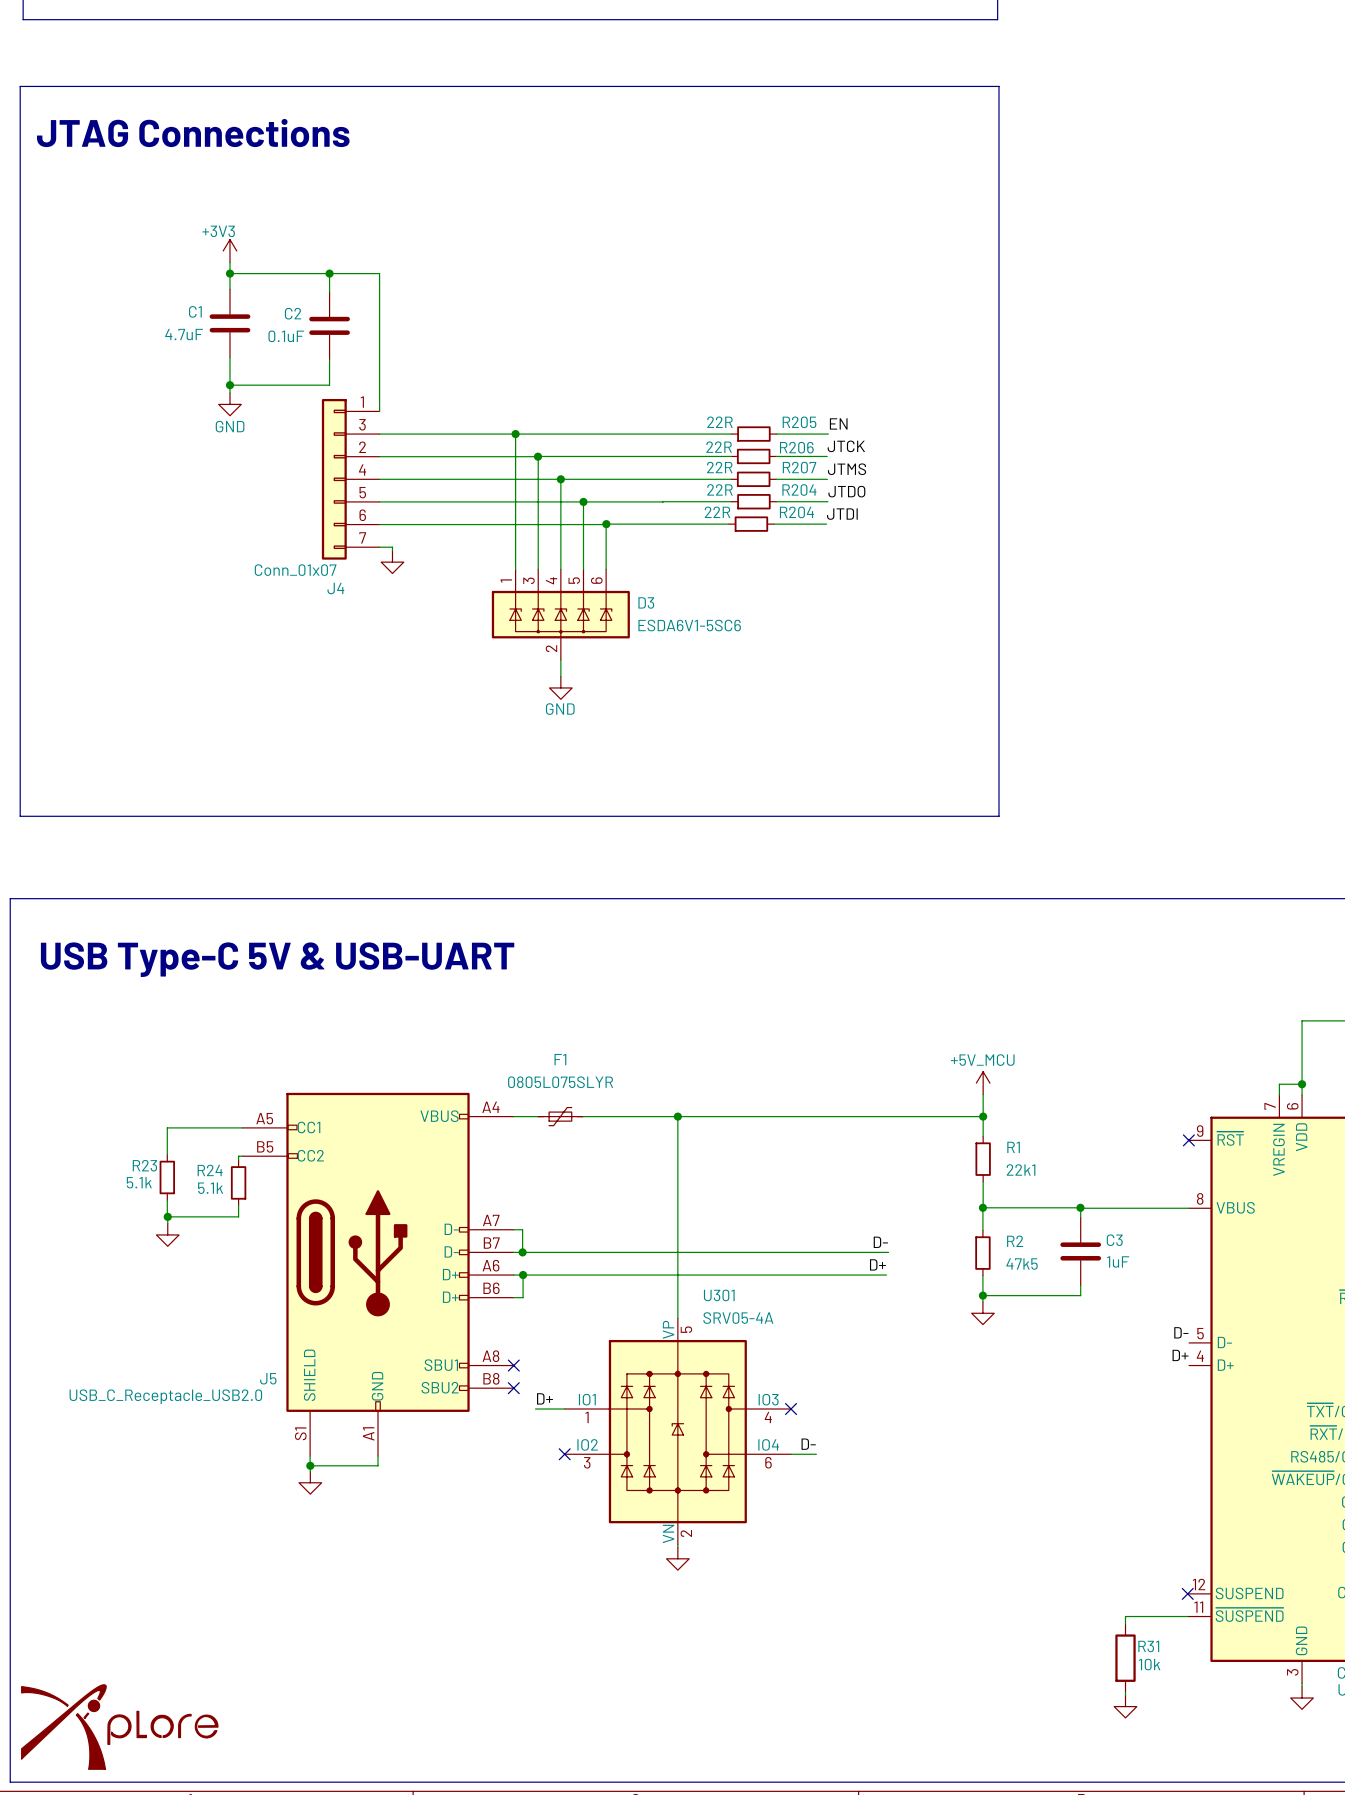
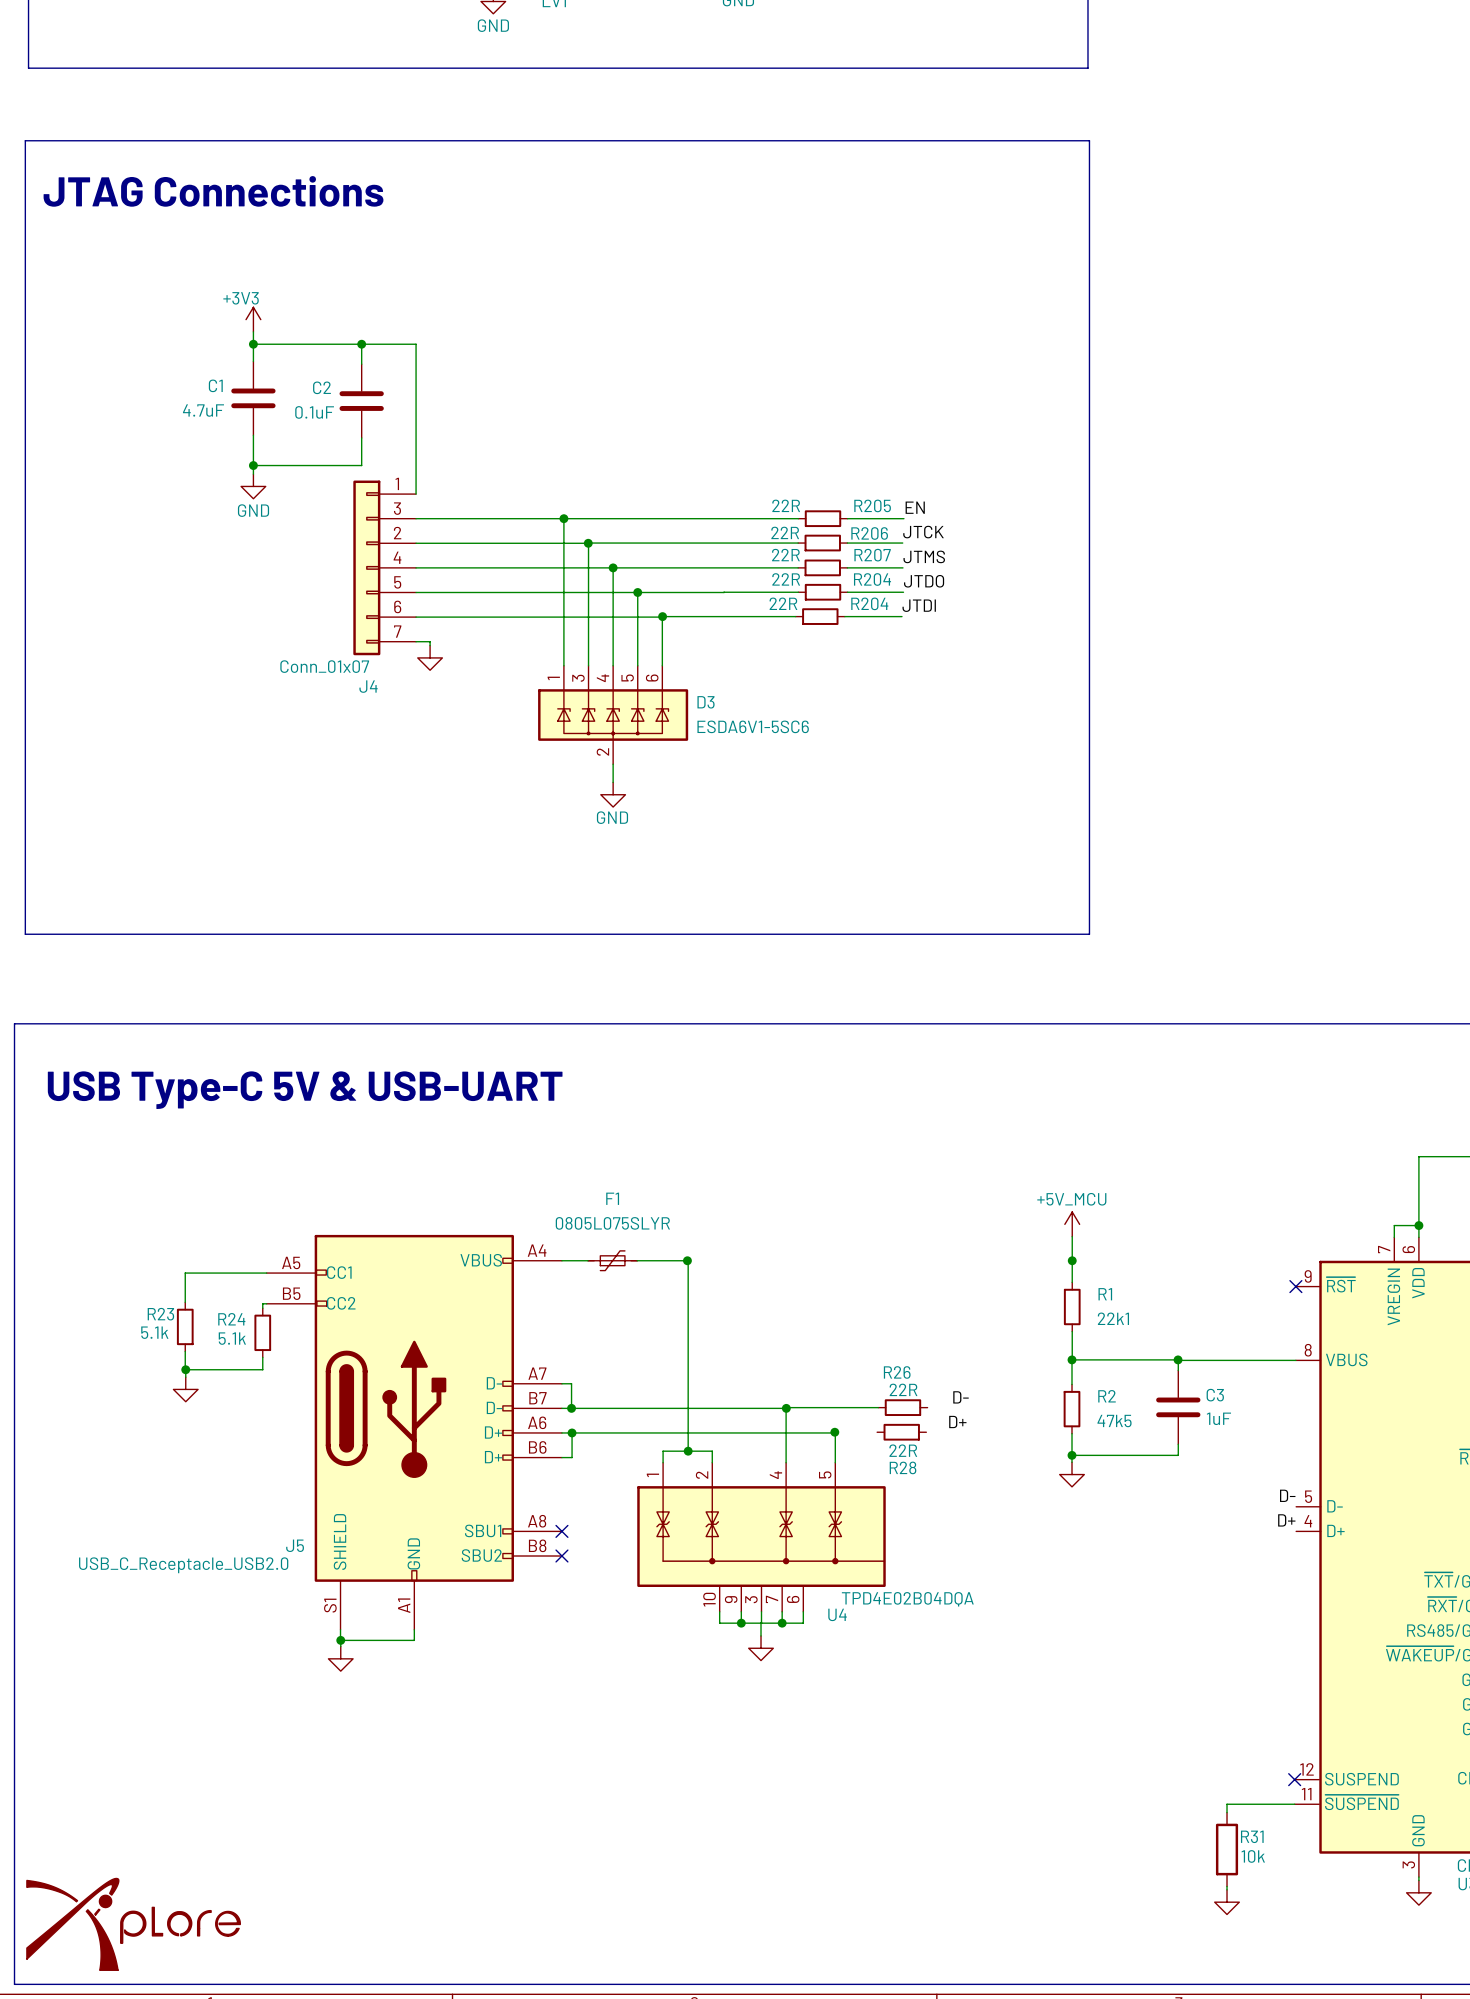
wire: (629, 1116) (983, 1116) -> (688, 1260) (688, 1451)
wire: (677, 1116) (677, 1318) -> none
junction position: (677, 1116) -> (687, 1260)
wire: none -> (878, 1407) (786, 1407) (786, 1462)
R26: none -> 22R (902, 1407)
wire: (720, 1252) (888, 1252) -> none
junction: none -> (786, 1408)
junction: none -> (834, 1432)
R28: none -> 22R (901, 1432)
wire: (764, 1275) (886, 1275) -> (834, 1432) (835, 1462)
junction: none -> (688, 1451)
wire: none -> (663, 1462) (663, 1451) (712, 1451) (712, 1462)
U4: none -> TPD4E02B04DQA (761, 1537)
label: D+ (544, 1398) -> none
wire: (535, 1409) (564, 1409) -> none
no-connect mark: (791, 1409) -> none
U301: SRV05-4A (677, 1431) -> none
label: D- (808, 1444) -> none
junction: none -> (741, 1623)
junction: none -> (782, 1623)
no-connect mark: (564, 1454) -> none
wire: (791, 1454) (816, 1454) -> none
wire: (677, 1544) (677, 1547) -> none
power symbol position: (677, 1558) -> (761, 1648)

